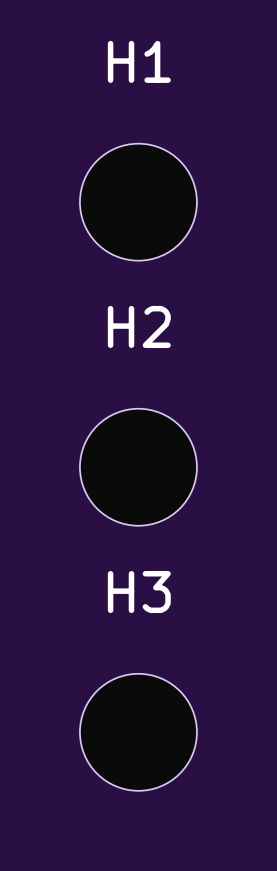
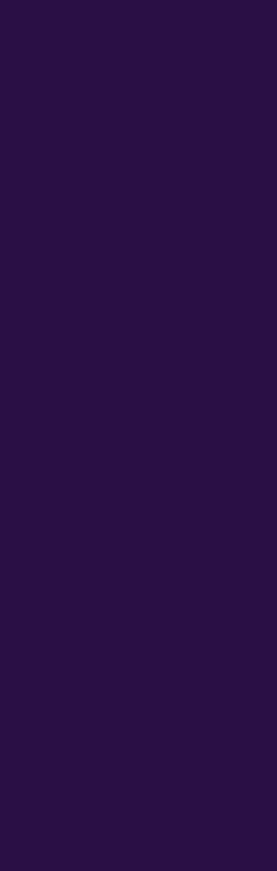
H1: (138, 202) -> none
H2: (138, 467) -> none
H3: (138, 732) -> none

